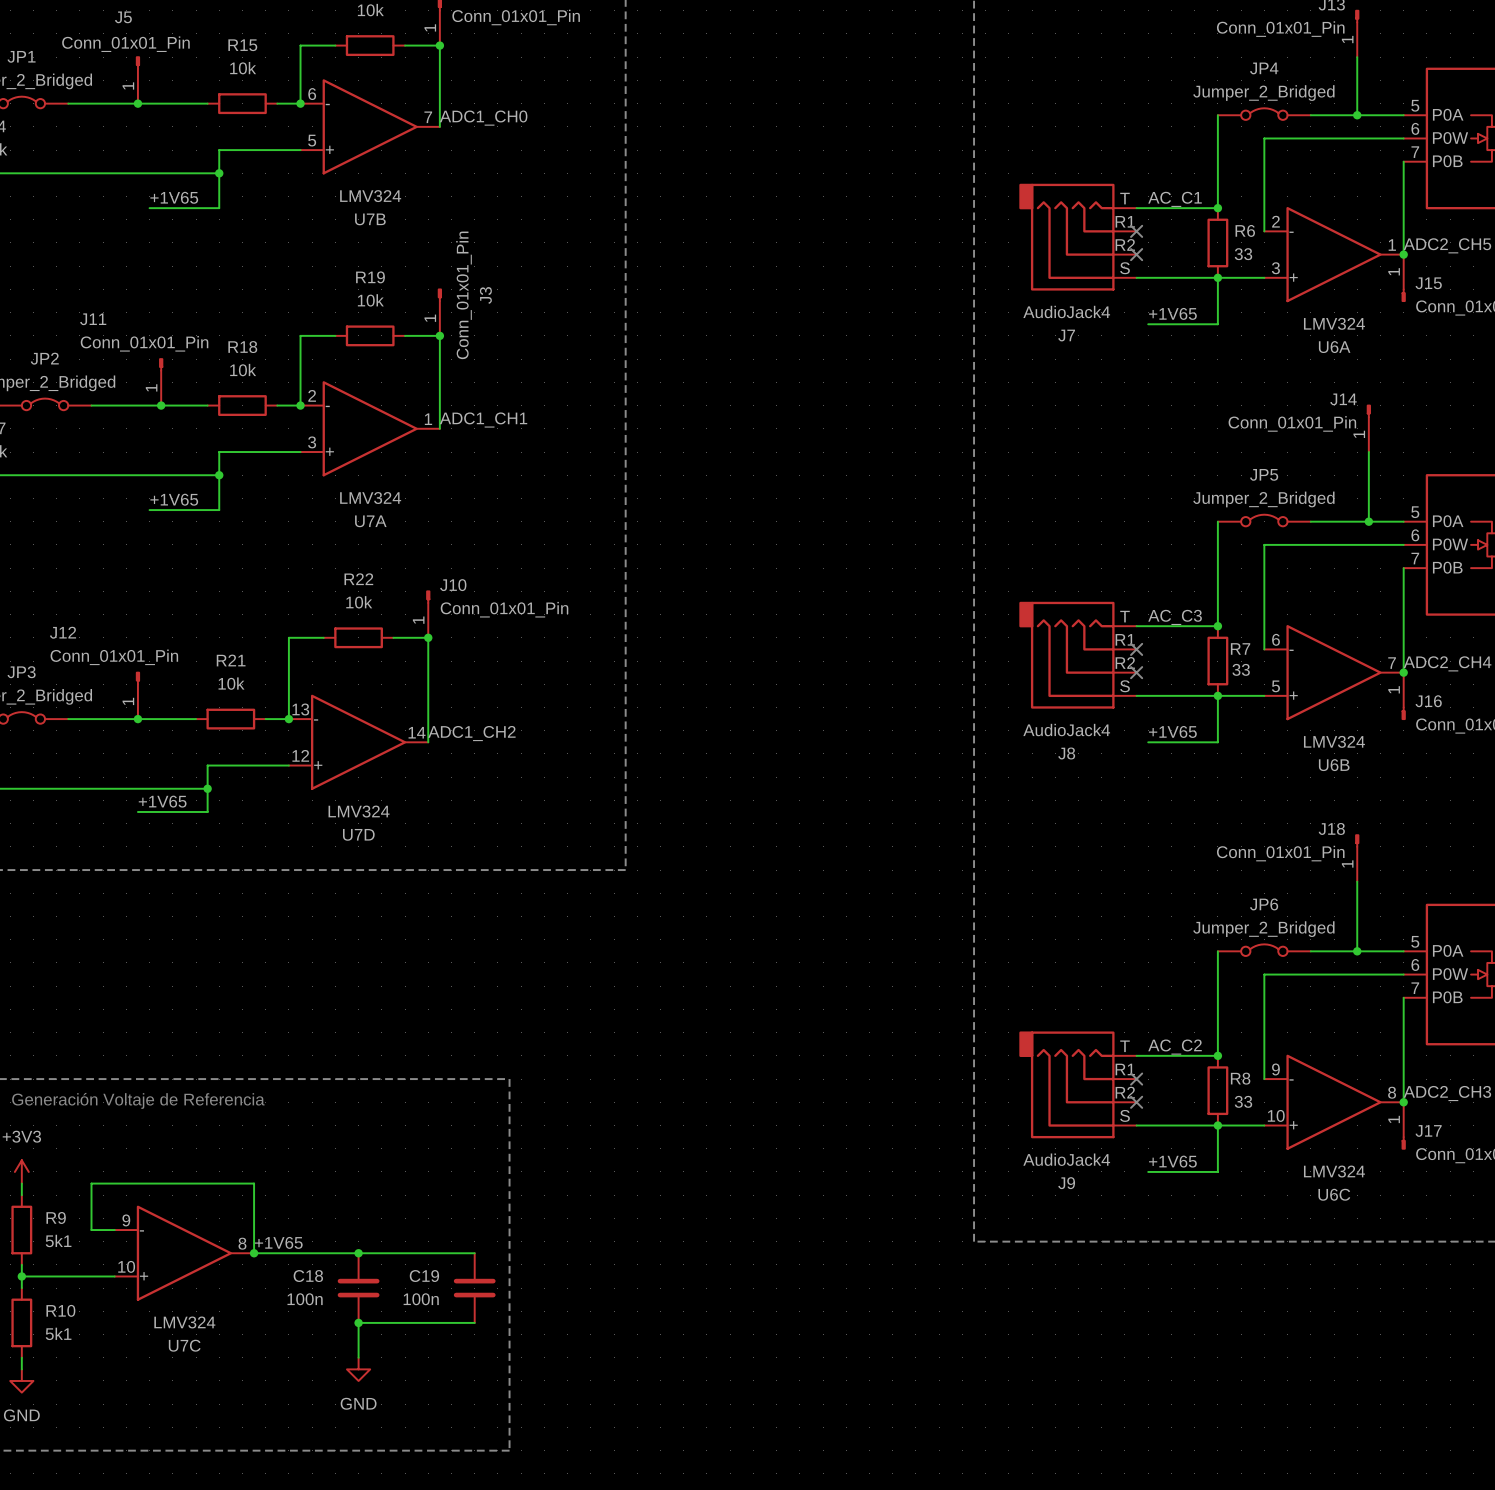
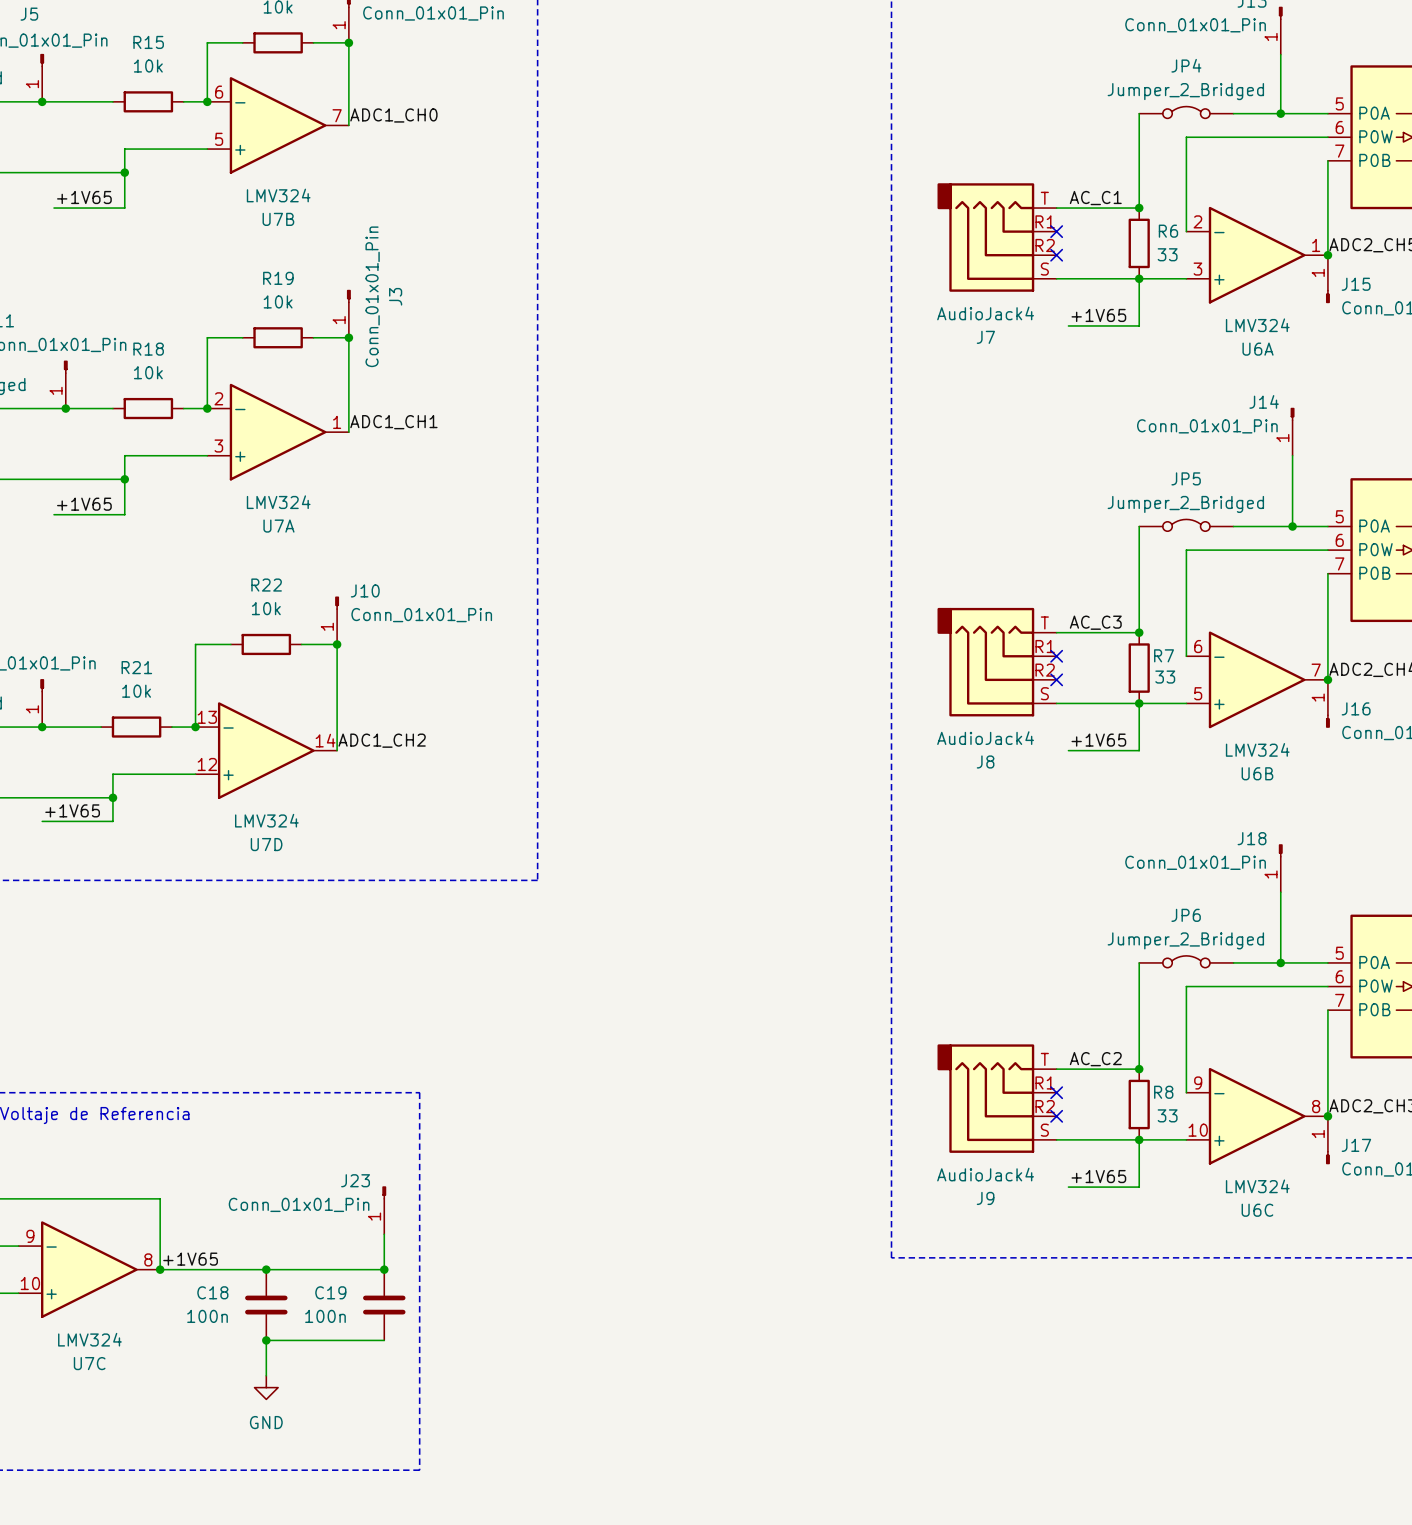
J23: none -> Conn_01x01_Pin (384, 1210)
wire: none -> (384, 1234) (384, 1269)
junction: none -> (384, 1269)

